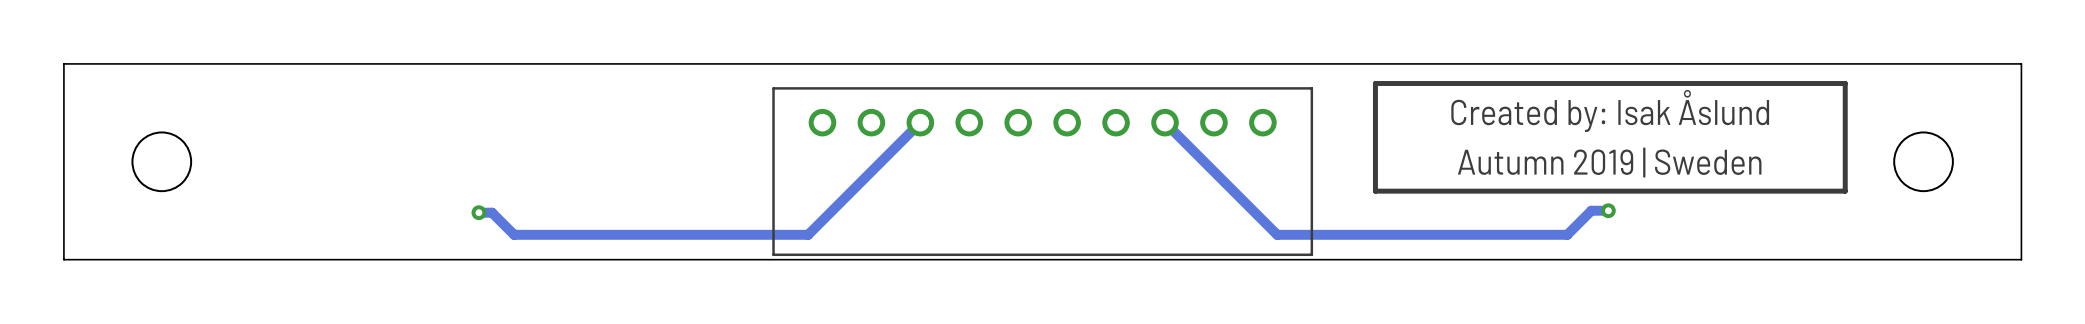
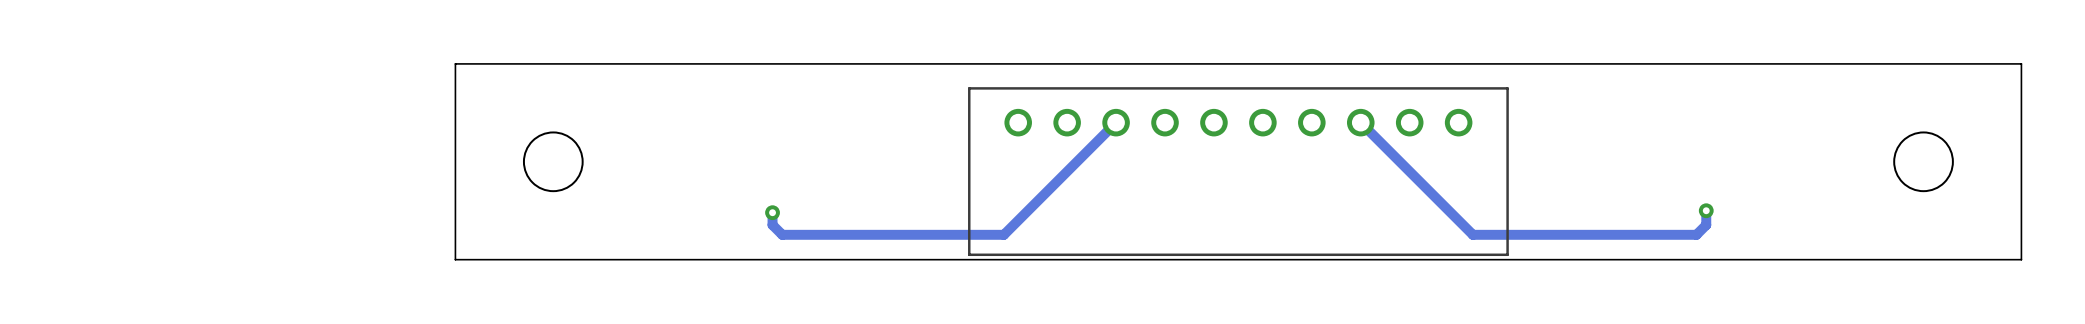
board edge: (455, 63) (63, 63) (63, 259) (455, 259) -> (455, 63) (455, 259)
line: (1845, 83) (1845, 191) (1375, 191) (1375, 83) (1845, 83) -> none
text: Created by: Isak Åslund (1610, 110) -> none
track: (920, 122) (808, 234) -> (1116, 122) (1003, 234) (808, 234)
track: (1165, 122) (1277, 234) (1472, 234) -> (1360, 122) (1472, 234)
round board edge position: (161, 161) -> (553, 161)
text: Autumn 2019 | Sweden (1609, 162) -> none
part position: (1042, 171) -> (1238, 171)
track: (1608, 210) (1591, 210) (1567, 234) -> (1706, 210) (1706, 225) (1696, 234) (1567, 234)
via position: (1608, 210) -> (1706, 210)
track: (478, 212) (492, 212) (514, 234) (782, 234) -> (772, 212) (772, 225) (782, 234)
via: (478, 212) -> none
via: none -> (772, 212)

